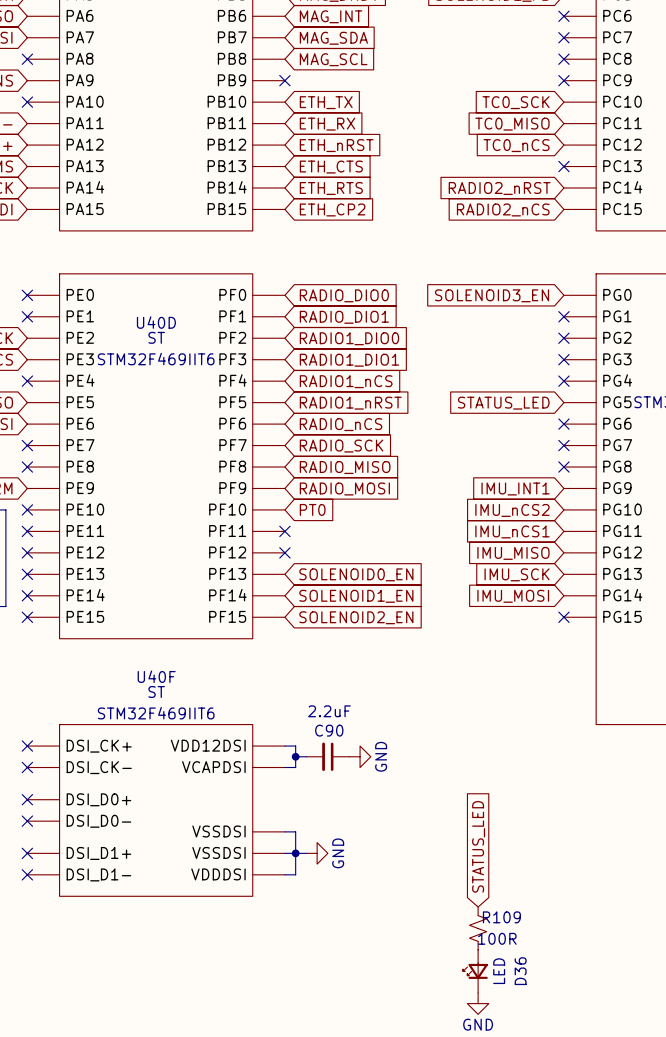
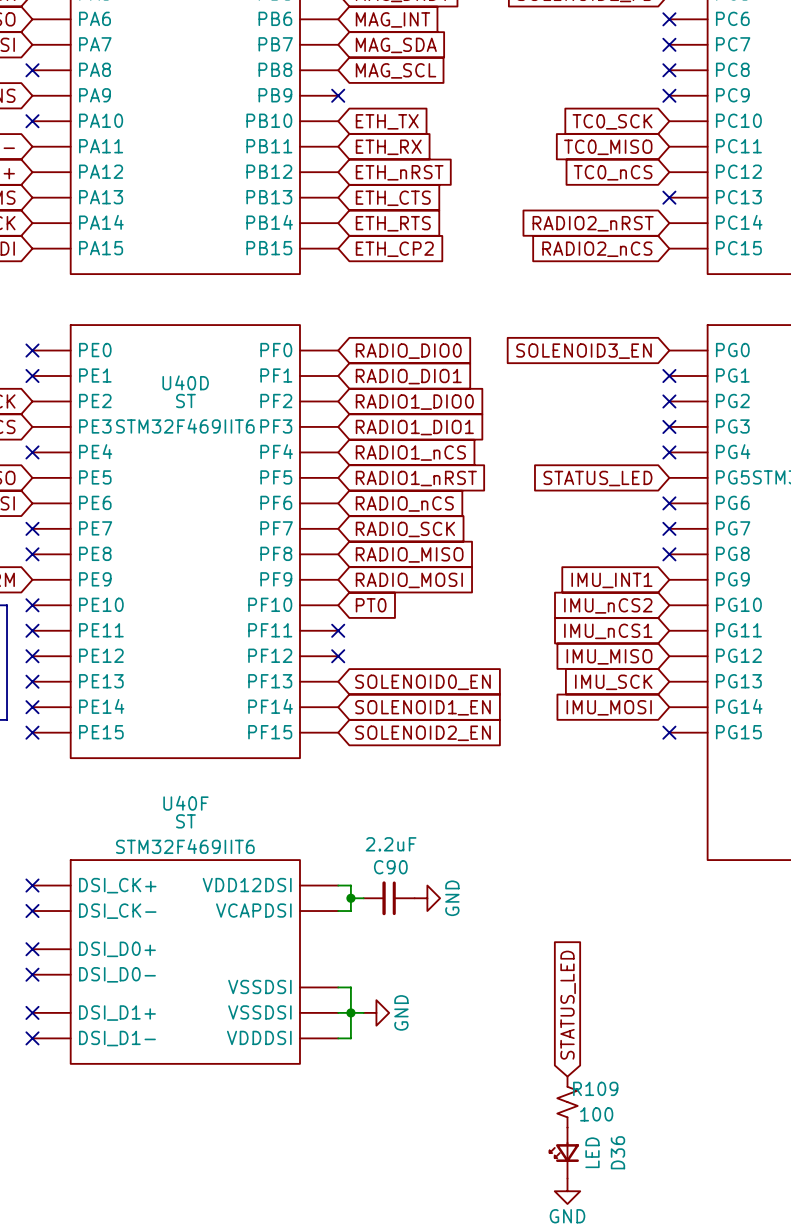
R109 value: 100R (497, 938) -> 100 (596, 1114)

